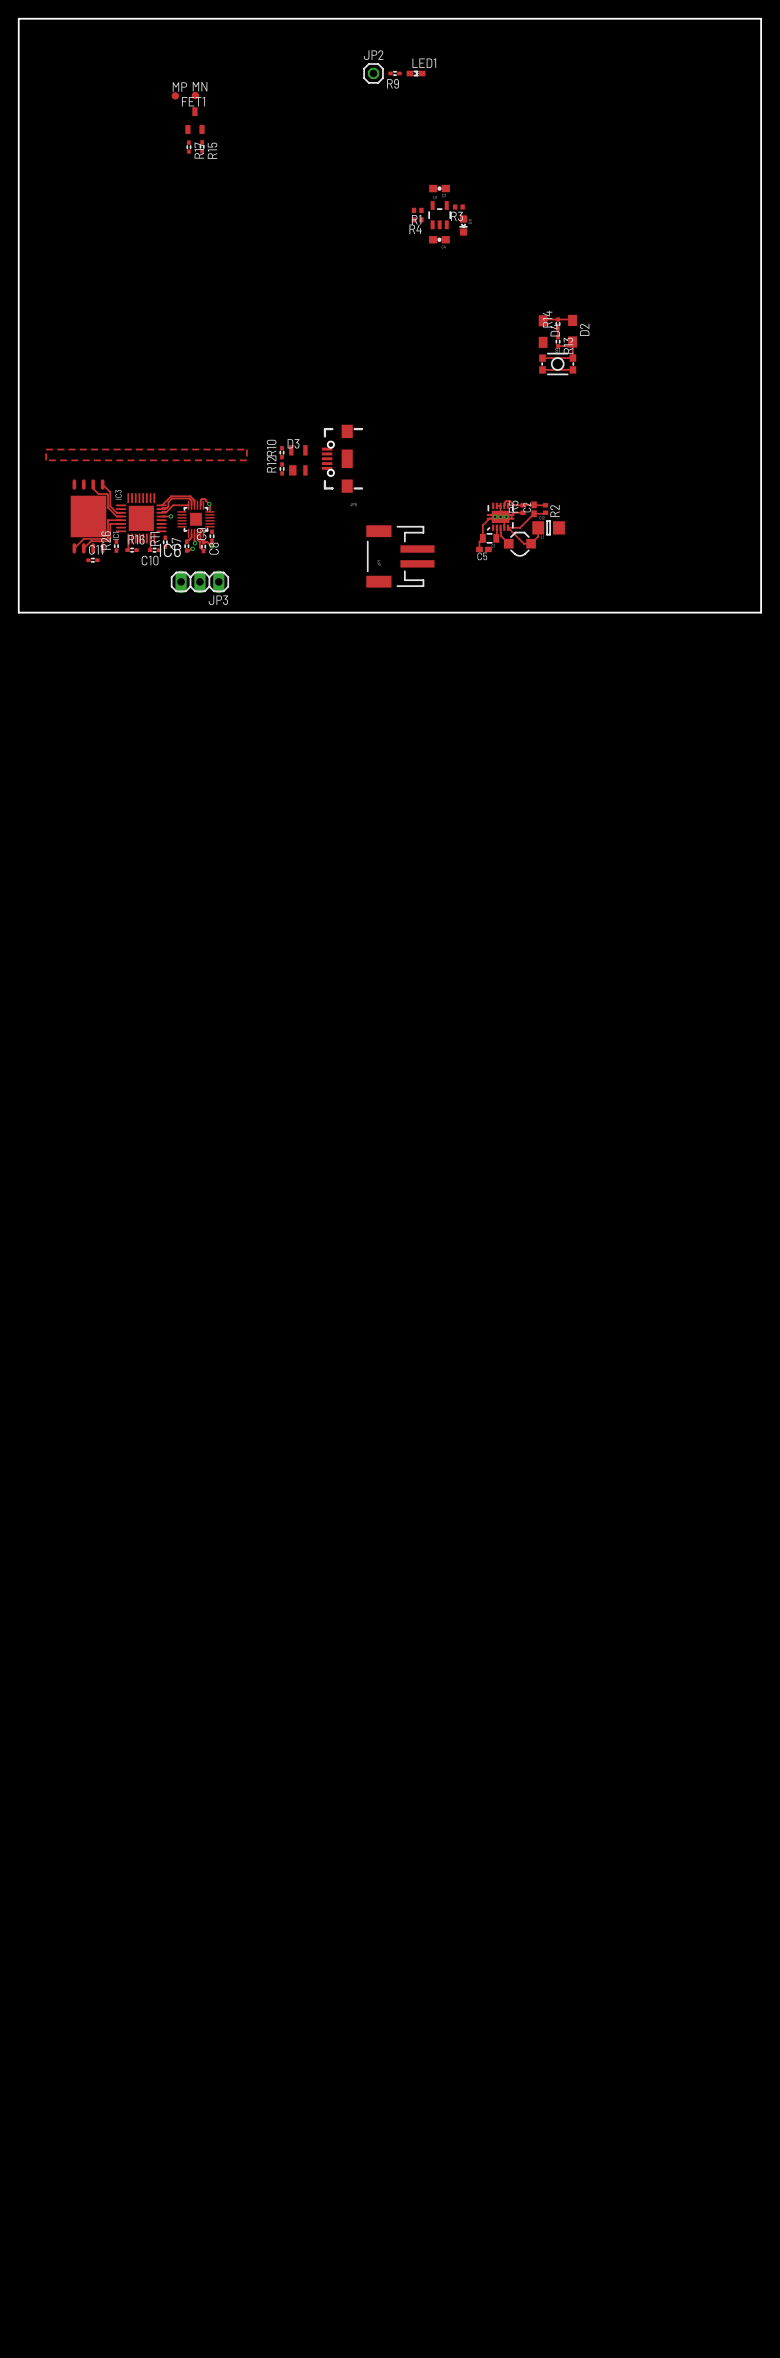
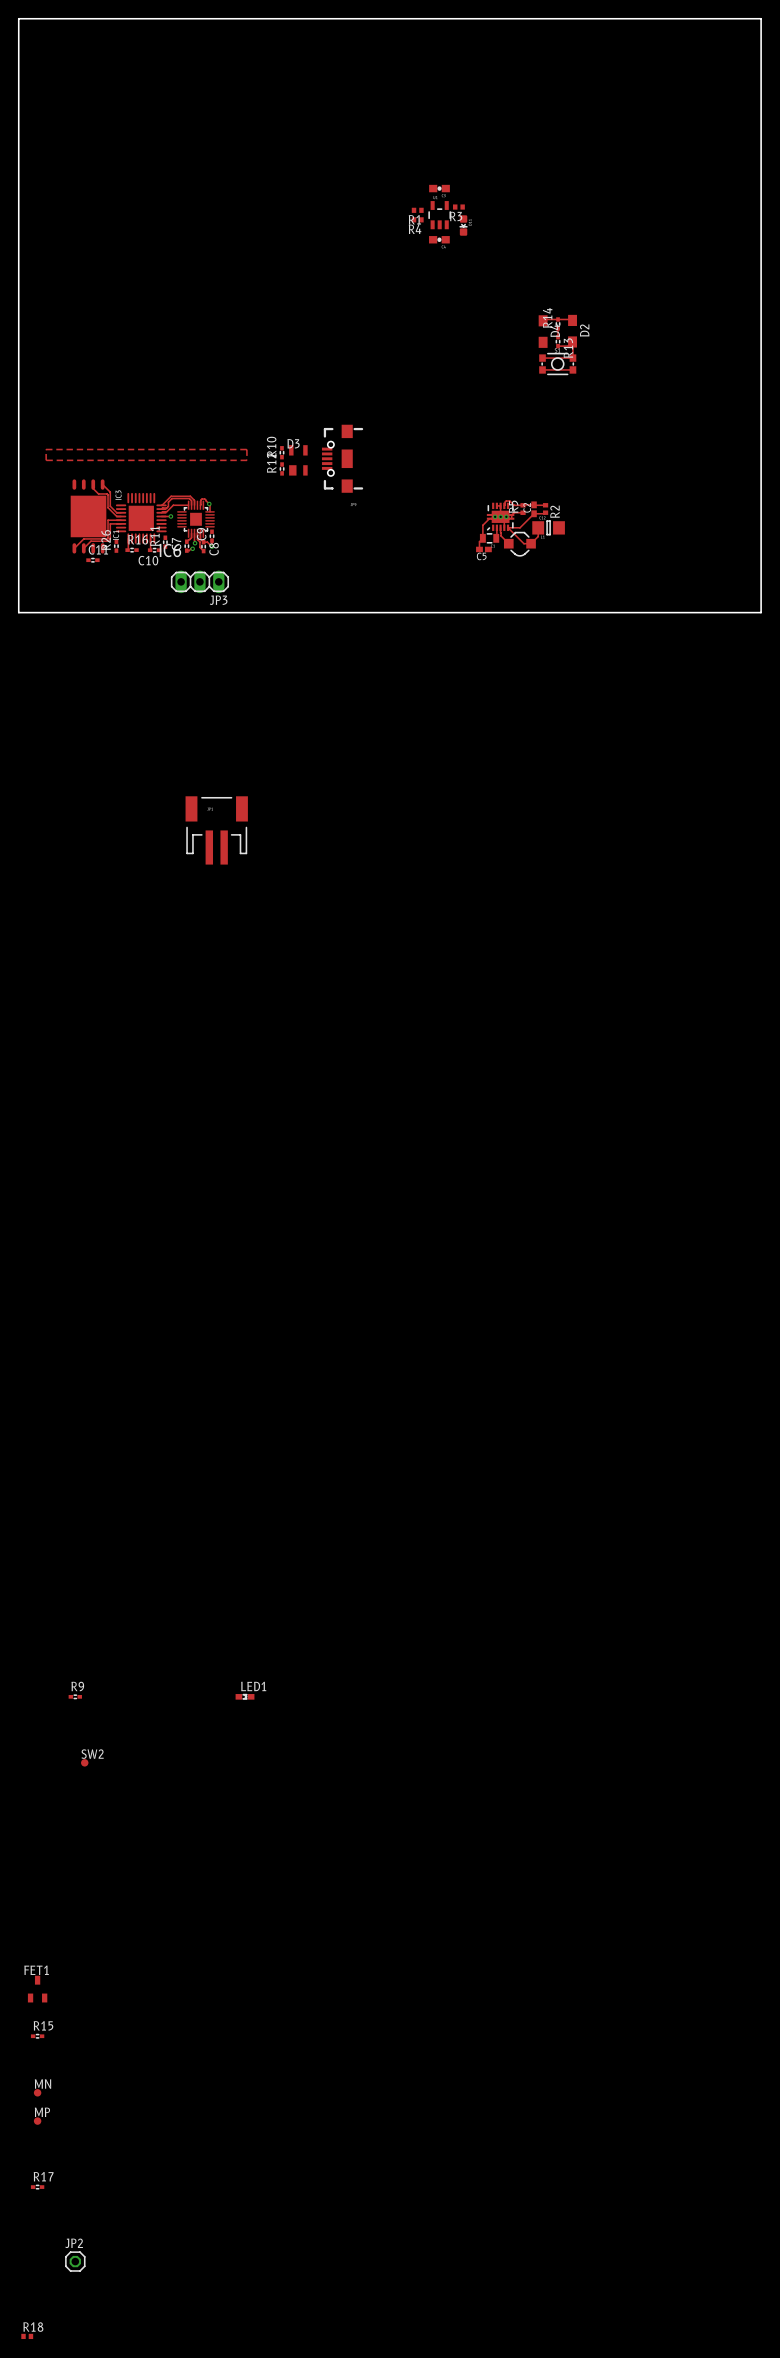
JP2 position: (373, 73) -> (75, 2261)
R9 position: (395, 73) -> (75, 1696)
LED1 position: (416, 73) -> (245, 1696)
R9 name position: R9 (393, 83) -> R9 (77, 1686)
MP: (175, 95) -> none
MN: (195, 95) -> none
FET1 position: (194, 120) -> (37, 1989)
R15 rotation: 0° (202, 146) -> 90° clockwise (37, 2036)
R15 position: (202, 146) -> (37, 2036)
R17 rotation: 0° (188, 147) -> 90° clockwise (37, 2187)
R17 position: (188, 147) -> (37, 2187)
R17 name position: R17 (199, 150) -> R17 (43, 2176)
R15 name position: R15 (212, 150) -> R15 (43, 2025)
part rotation: 0° (400, 556) -> 90° clockwise (216, 830)
part position: (400, 556) -> (216, 830)
SW2: none -> (84, 1762)
MN: none -> (37, 2092)
MP: none -> (37, 2121)
R18: none -> (27, 2336)

